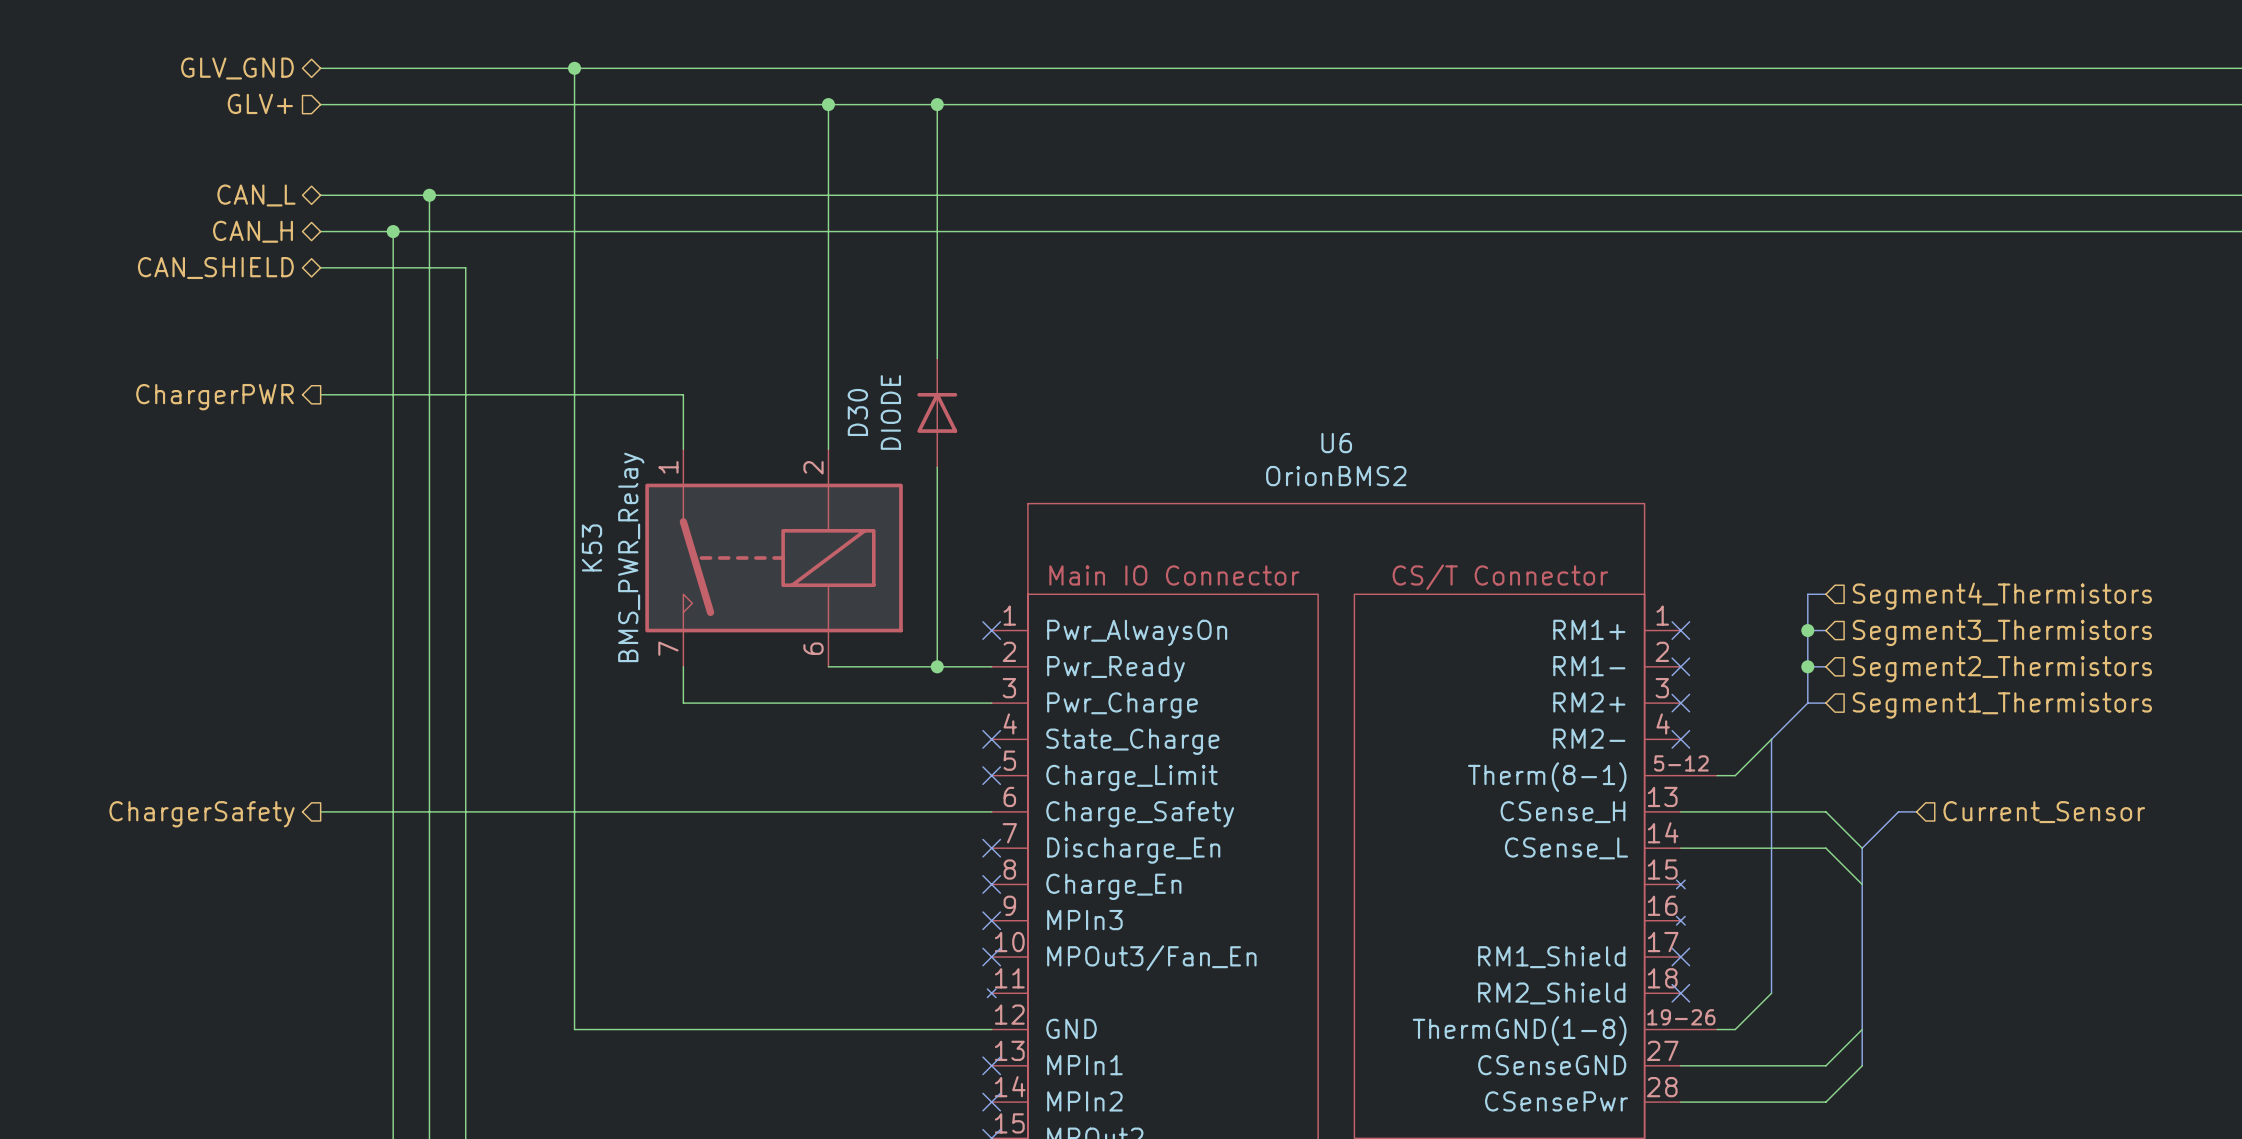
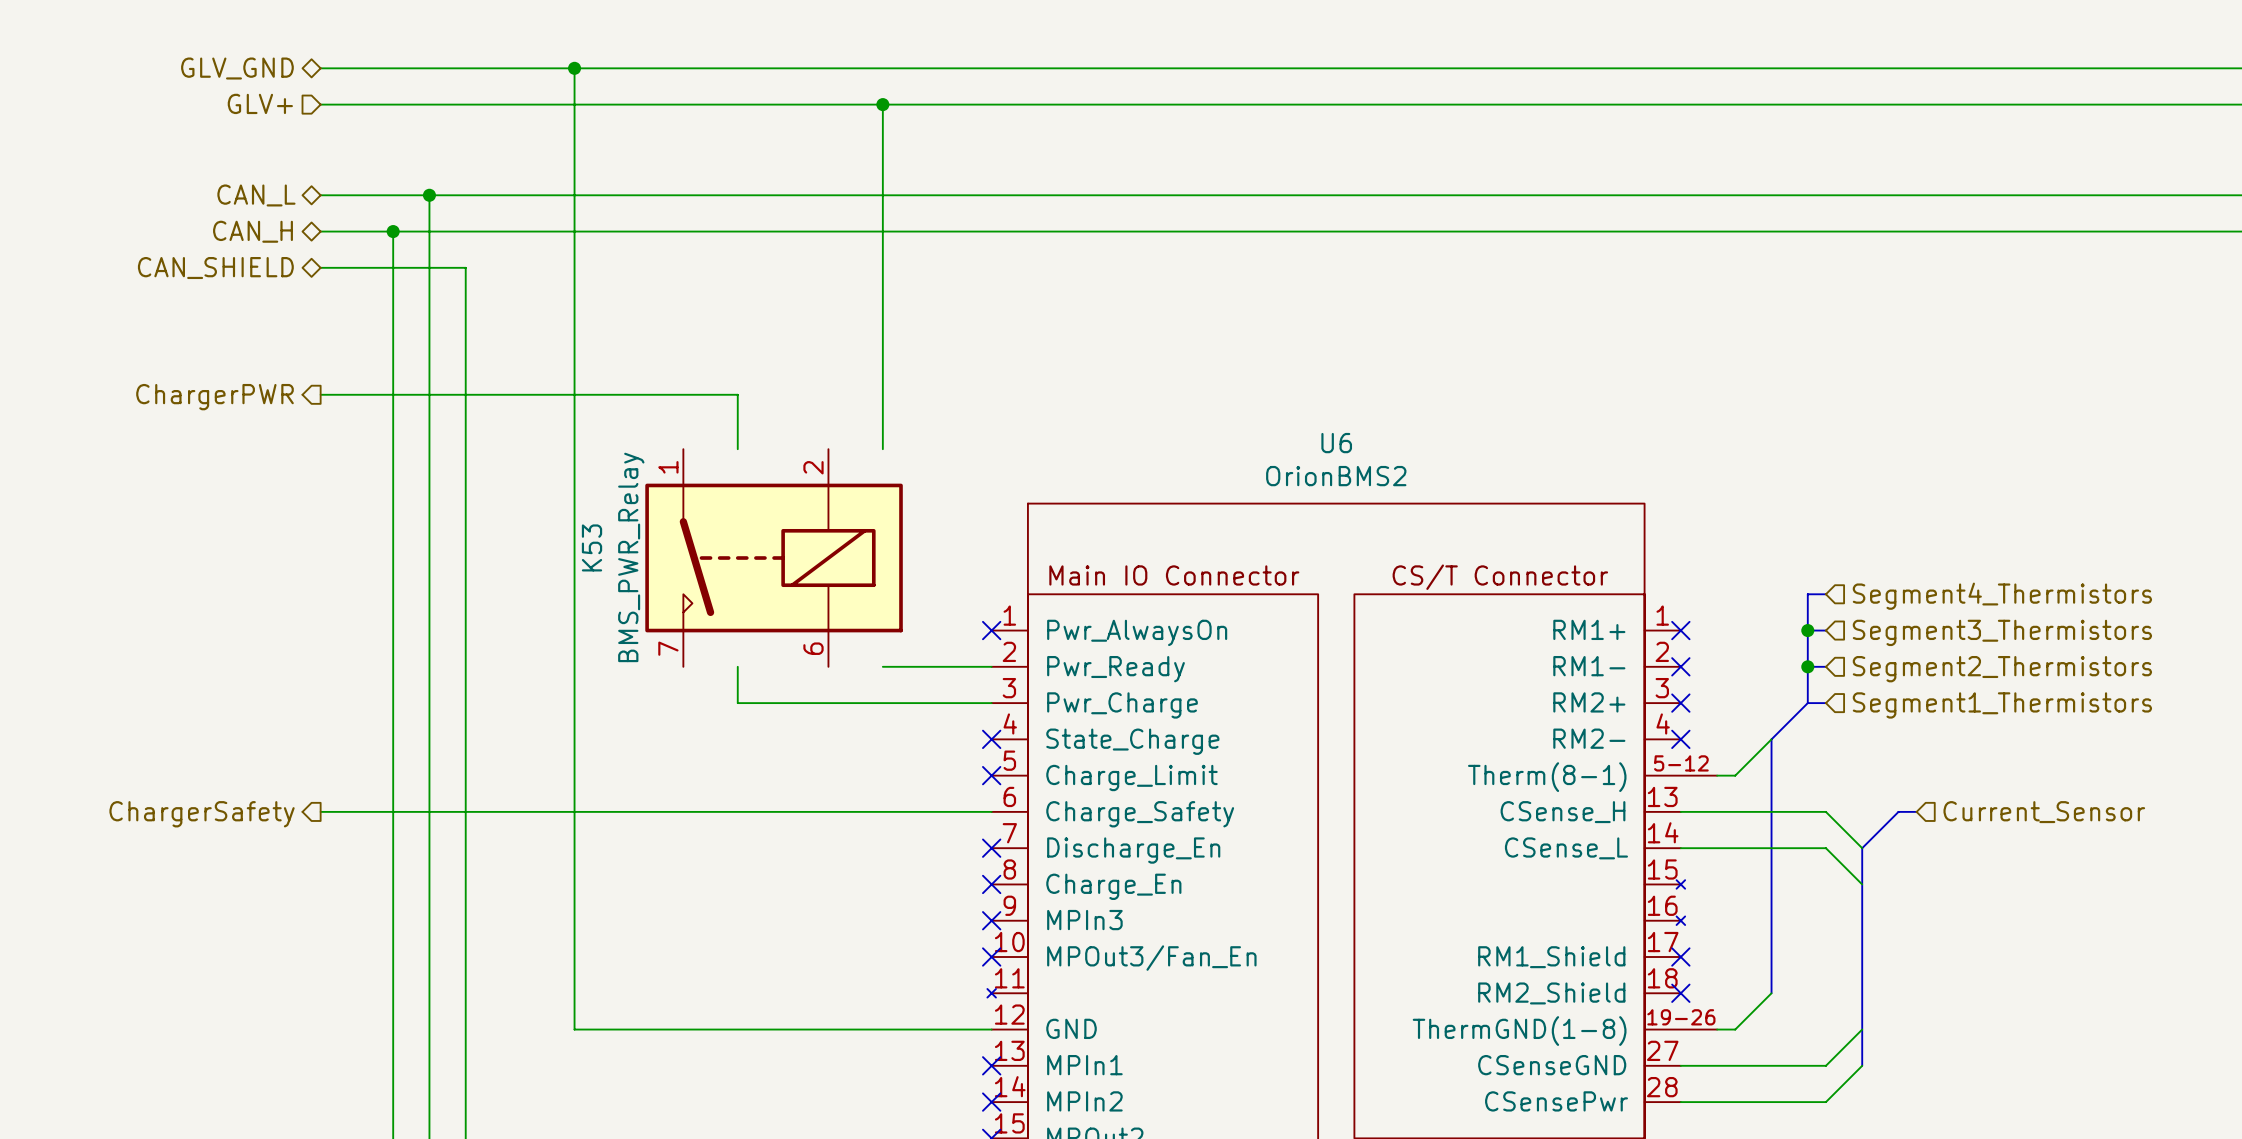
wire: (828, 104) (828, 449) -> (882, 104) (882, 449)
junction: (828, 104) -> none
junction: none -> (882, 104)
wire: (937, 104) (937, 358) -> none
junction: (937, 104) -> none
wire: (683, 394) (683, 449) -> (683, 394) (737, 394) (737, 449)
D30: DIODE (937, 412) -> none
wire: (937, 467) (937, 666) -> none
wire: (683, 666) (683, 703) (737, 703) -> (737, 666) (737, 703)
wire: (828, 666) (882, 666) -> none
junction: (937, 666) -> none

